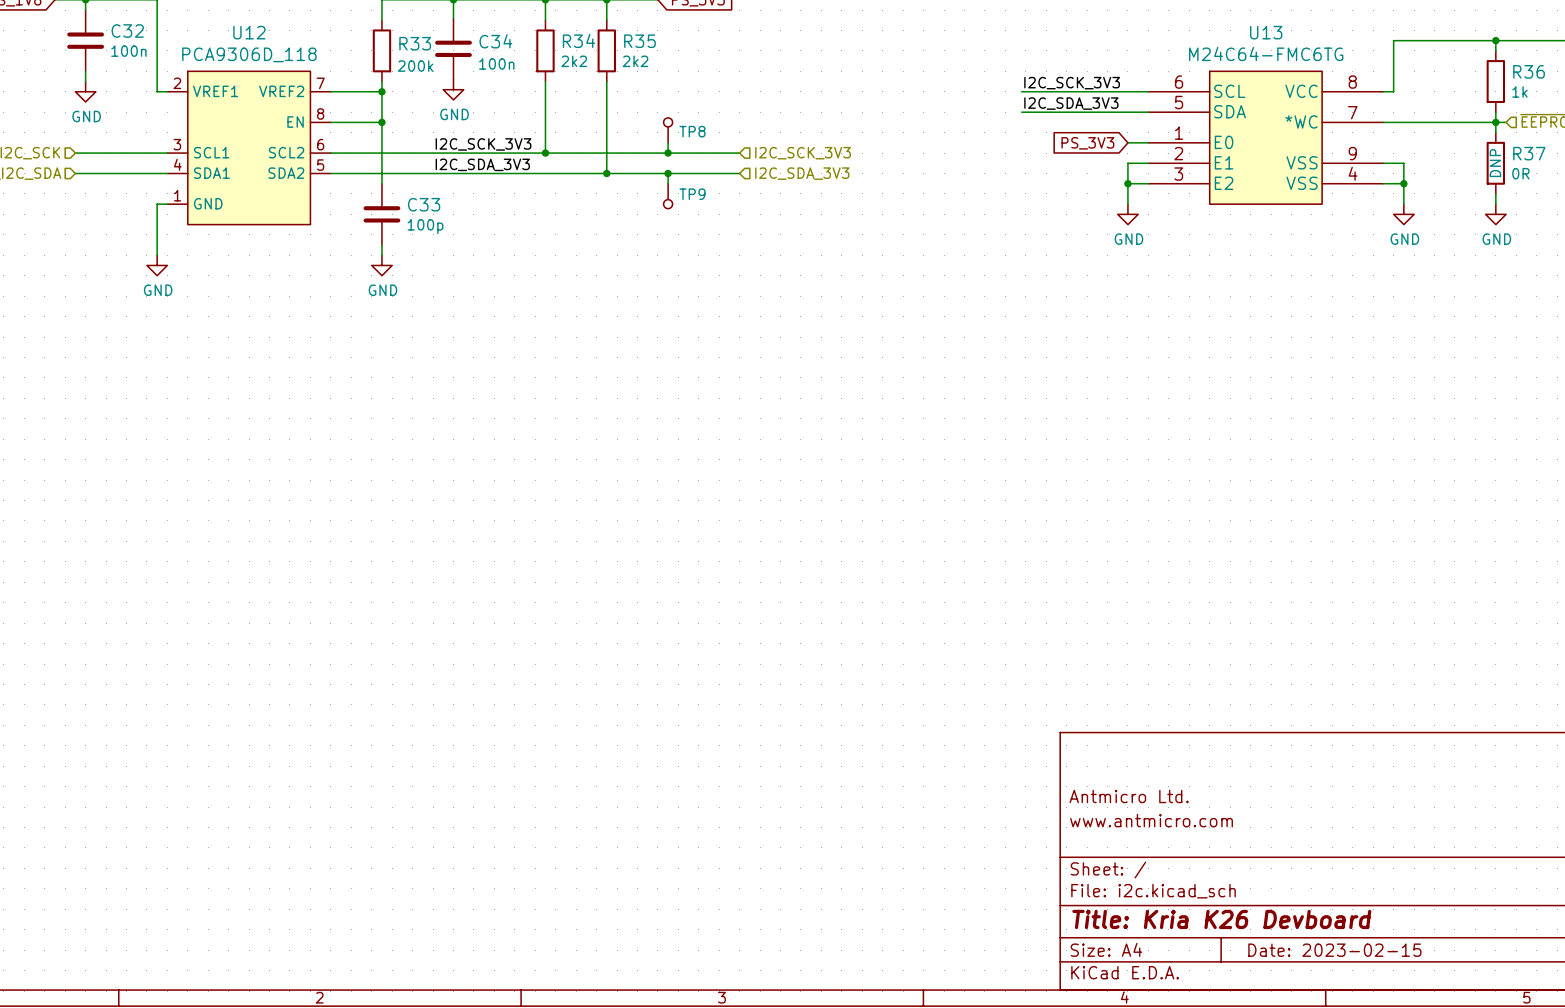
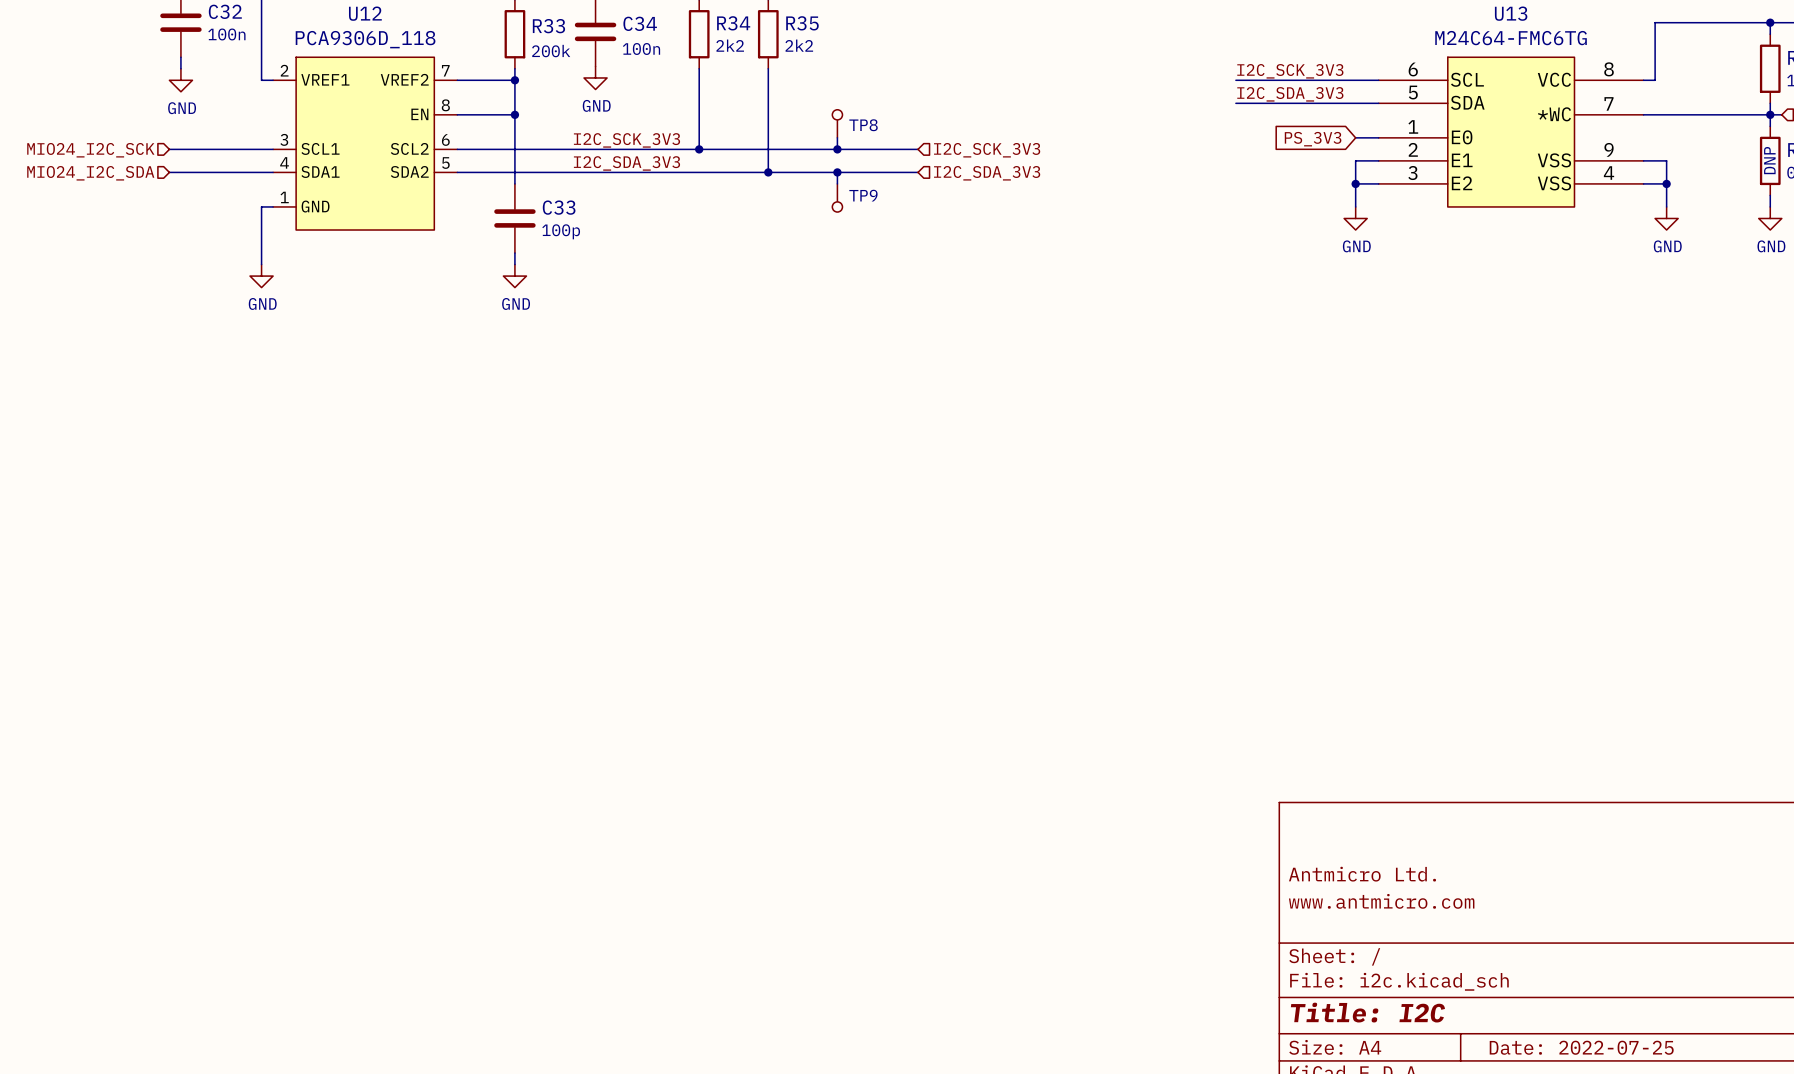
title block: Title: Kria K26 Devboard (1221, 919) -> Title: I2C (1367, 1012)
title block: Date: 2023-02-15 (1334, 950) -> Date: 2022-07-25 (1581, 1047)

